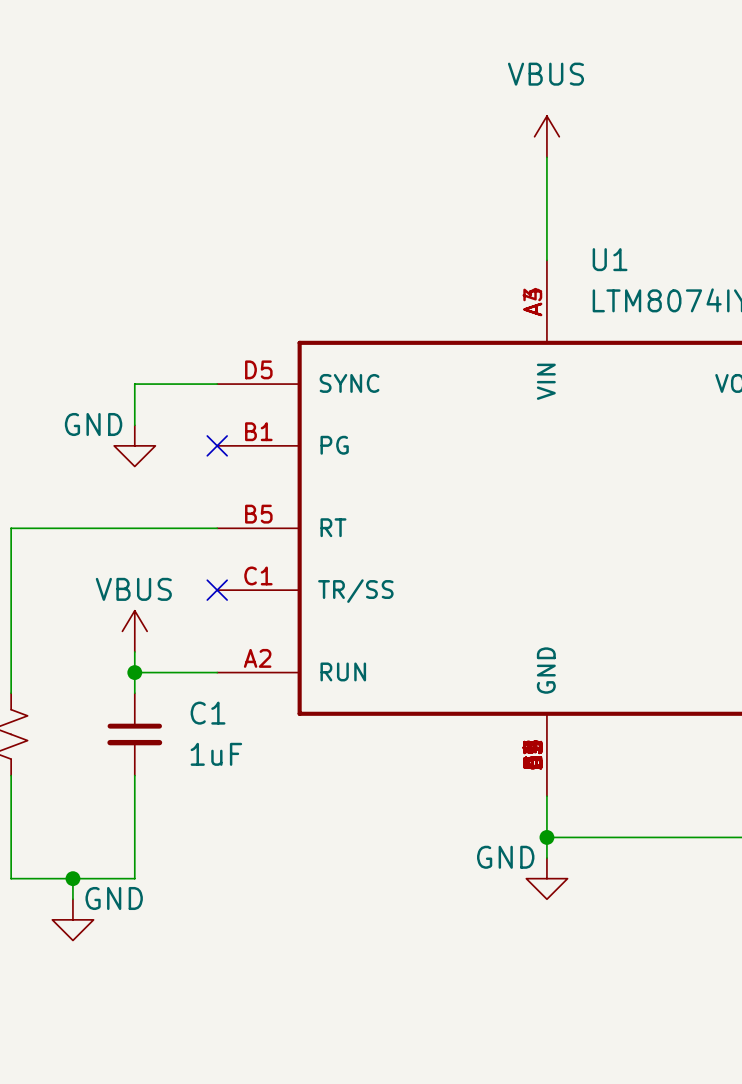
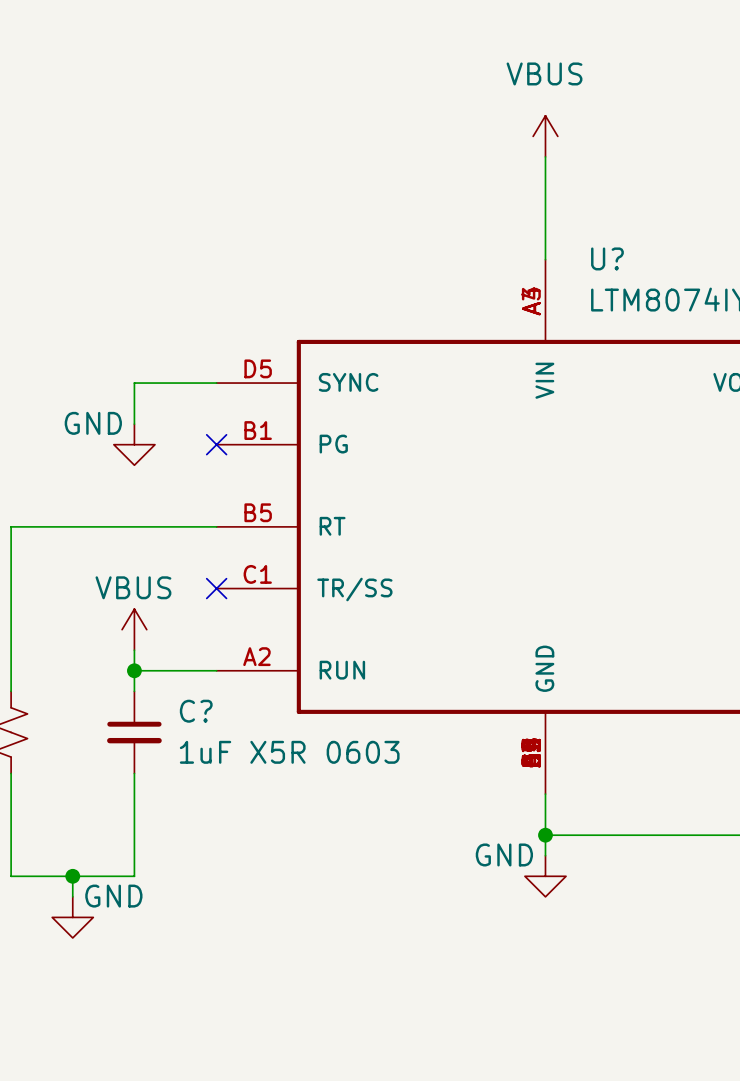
U1 name: U1 (610, 259) -> U? (607, 258)
C1 name: C1 (208, 713) -> C? (196, 711)
C1 value: 1uF (216, 754) -> 1uF X5R 0603 (289, 752)

